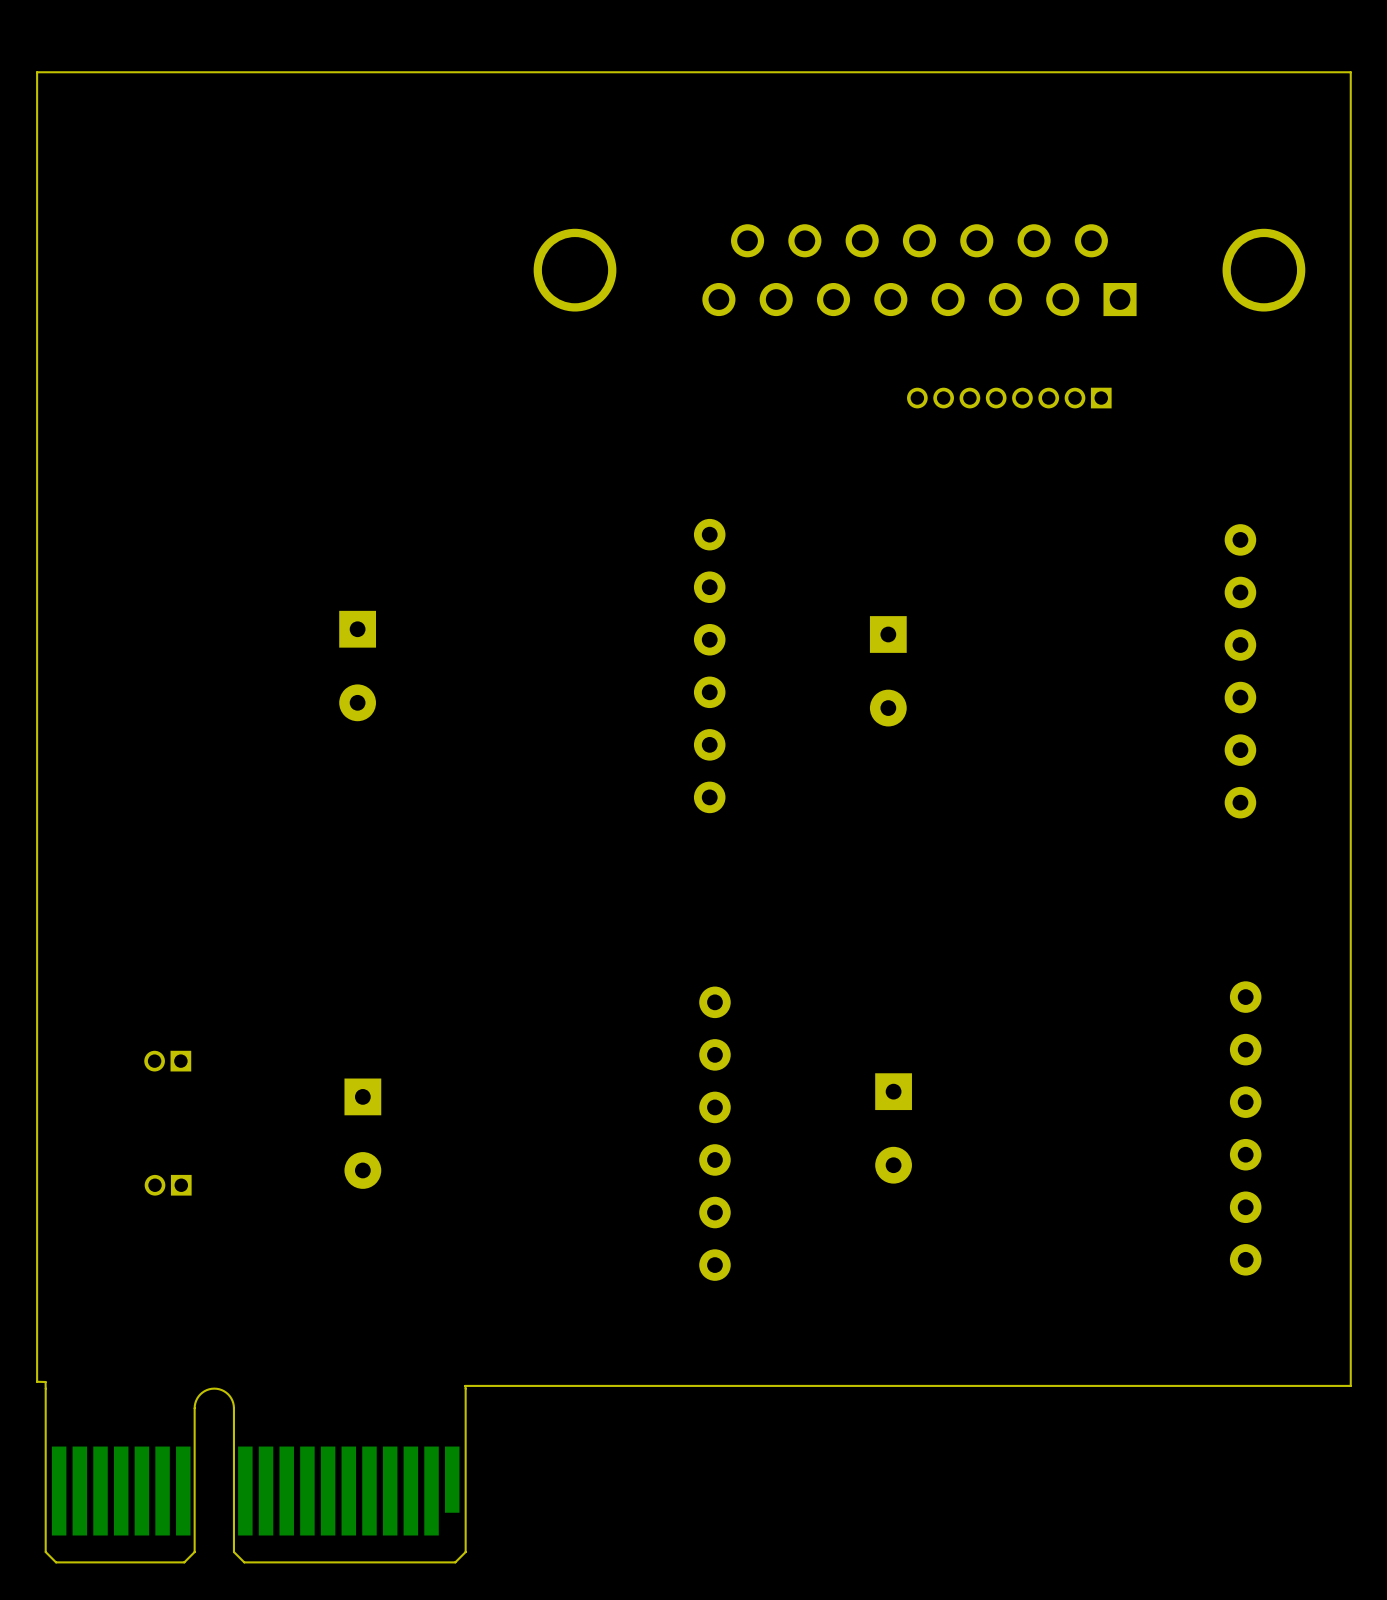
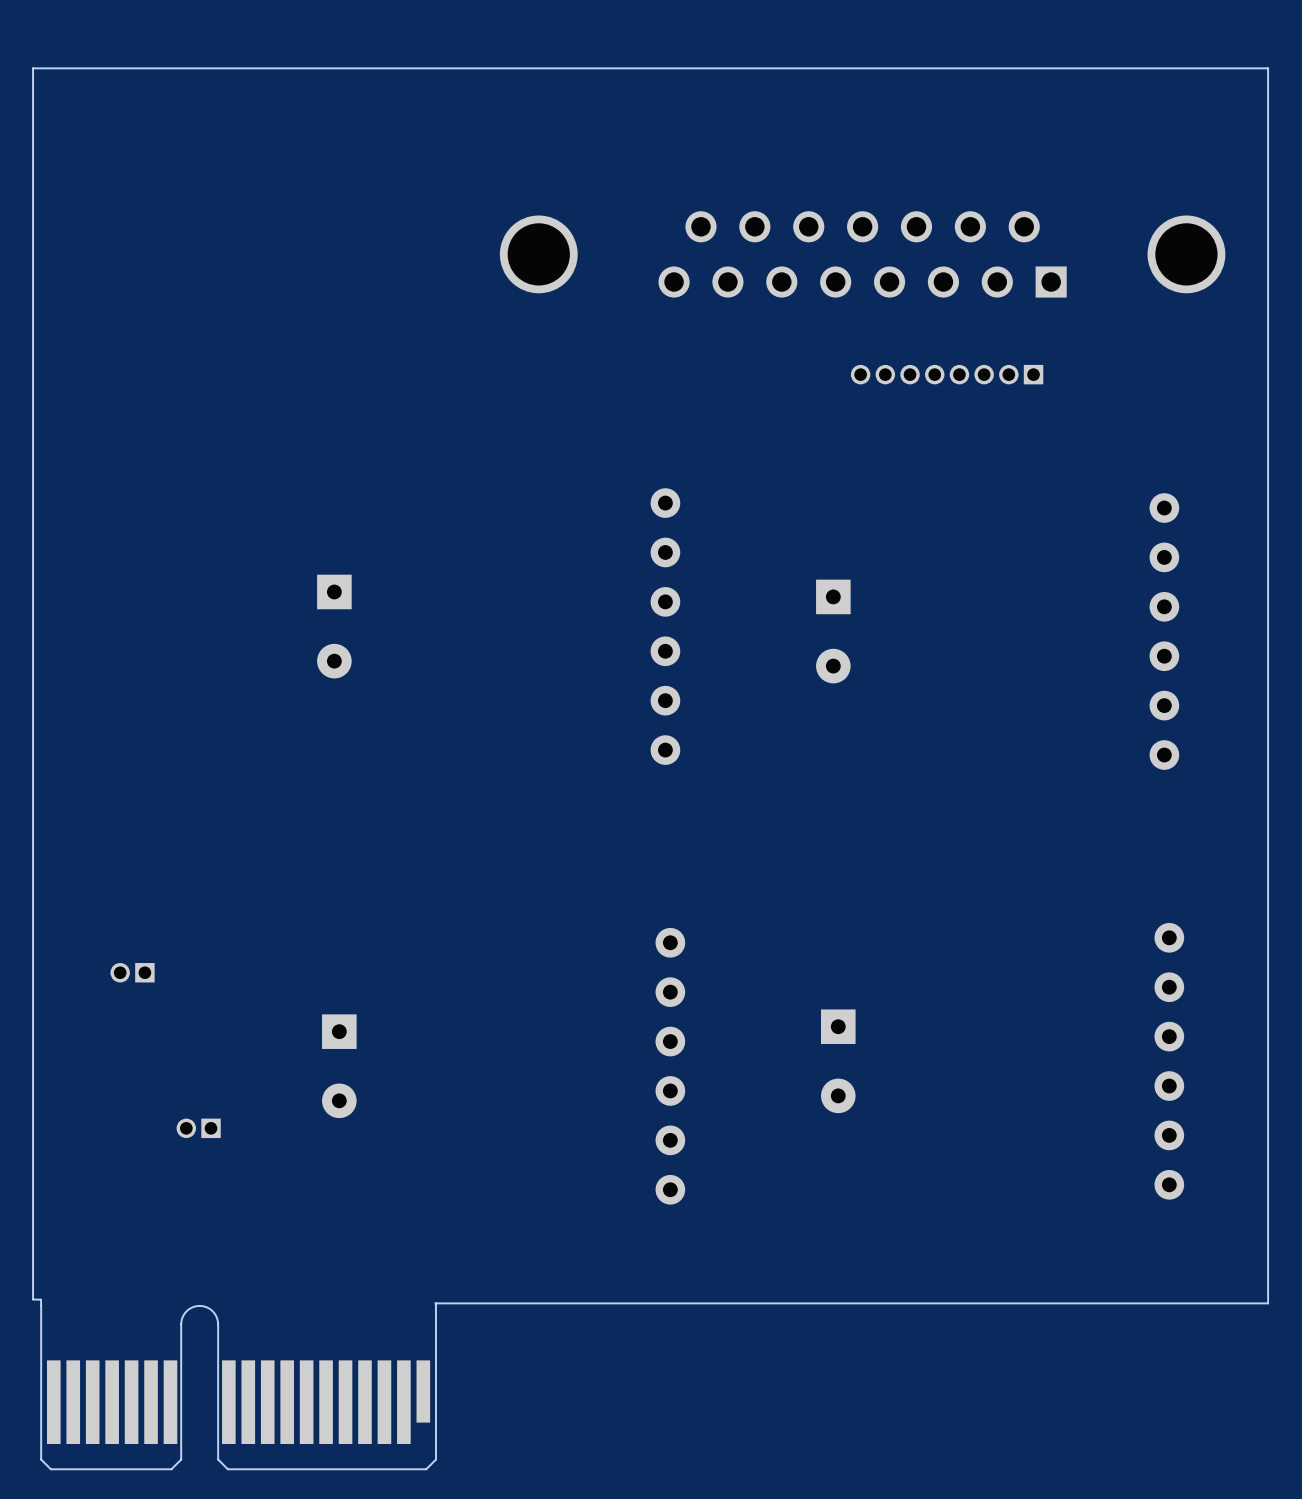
part position: (167, 1061) -> (132, 972)
part position: (168, 1185) -> (198, 1128)

